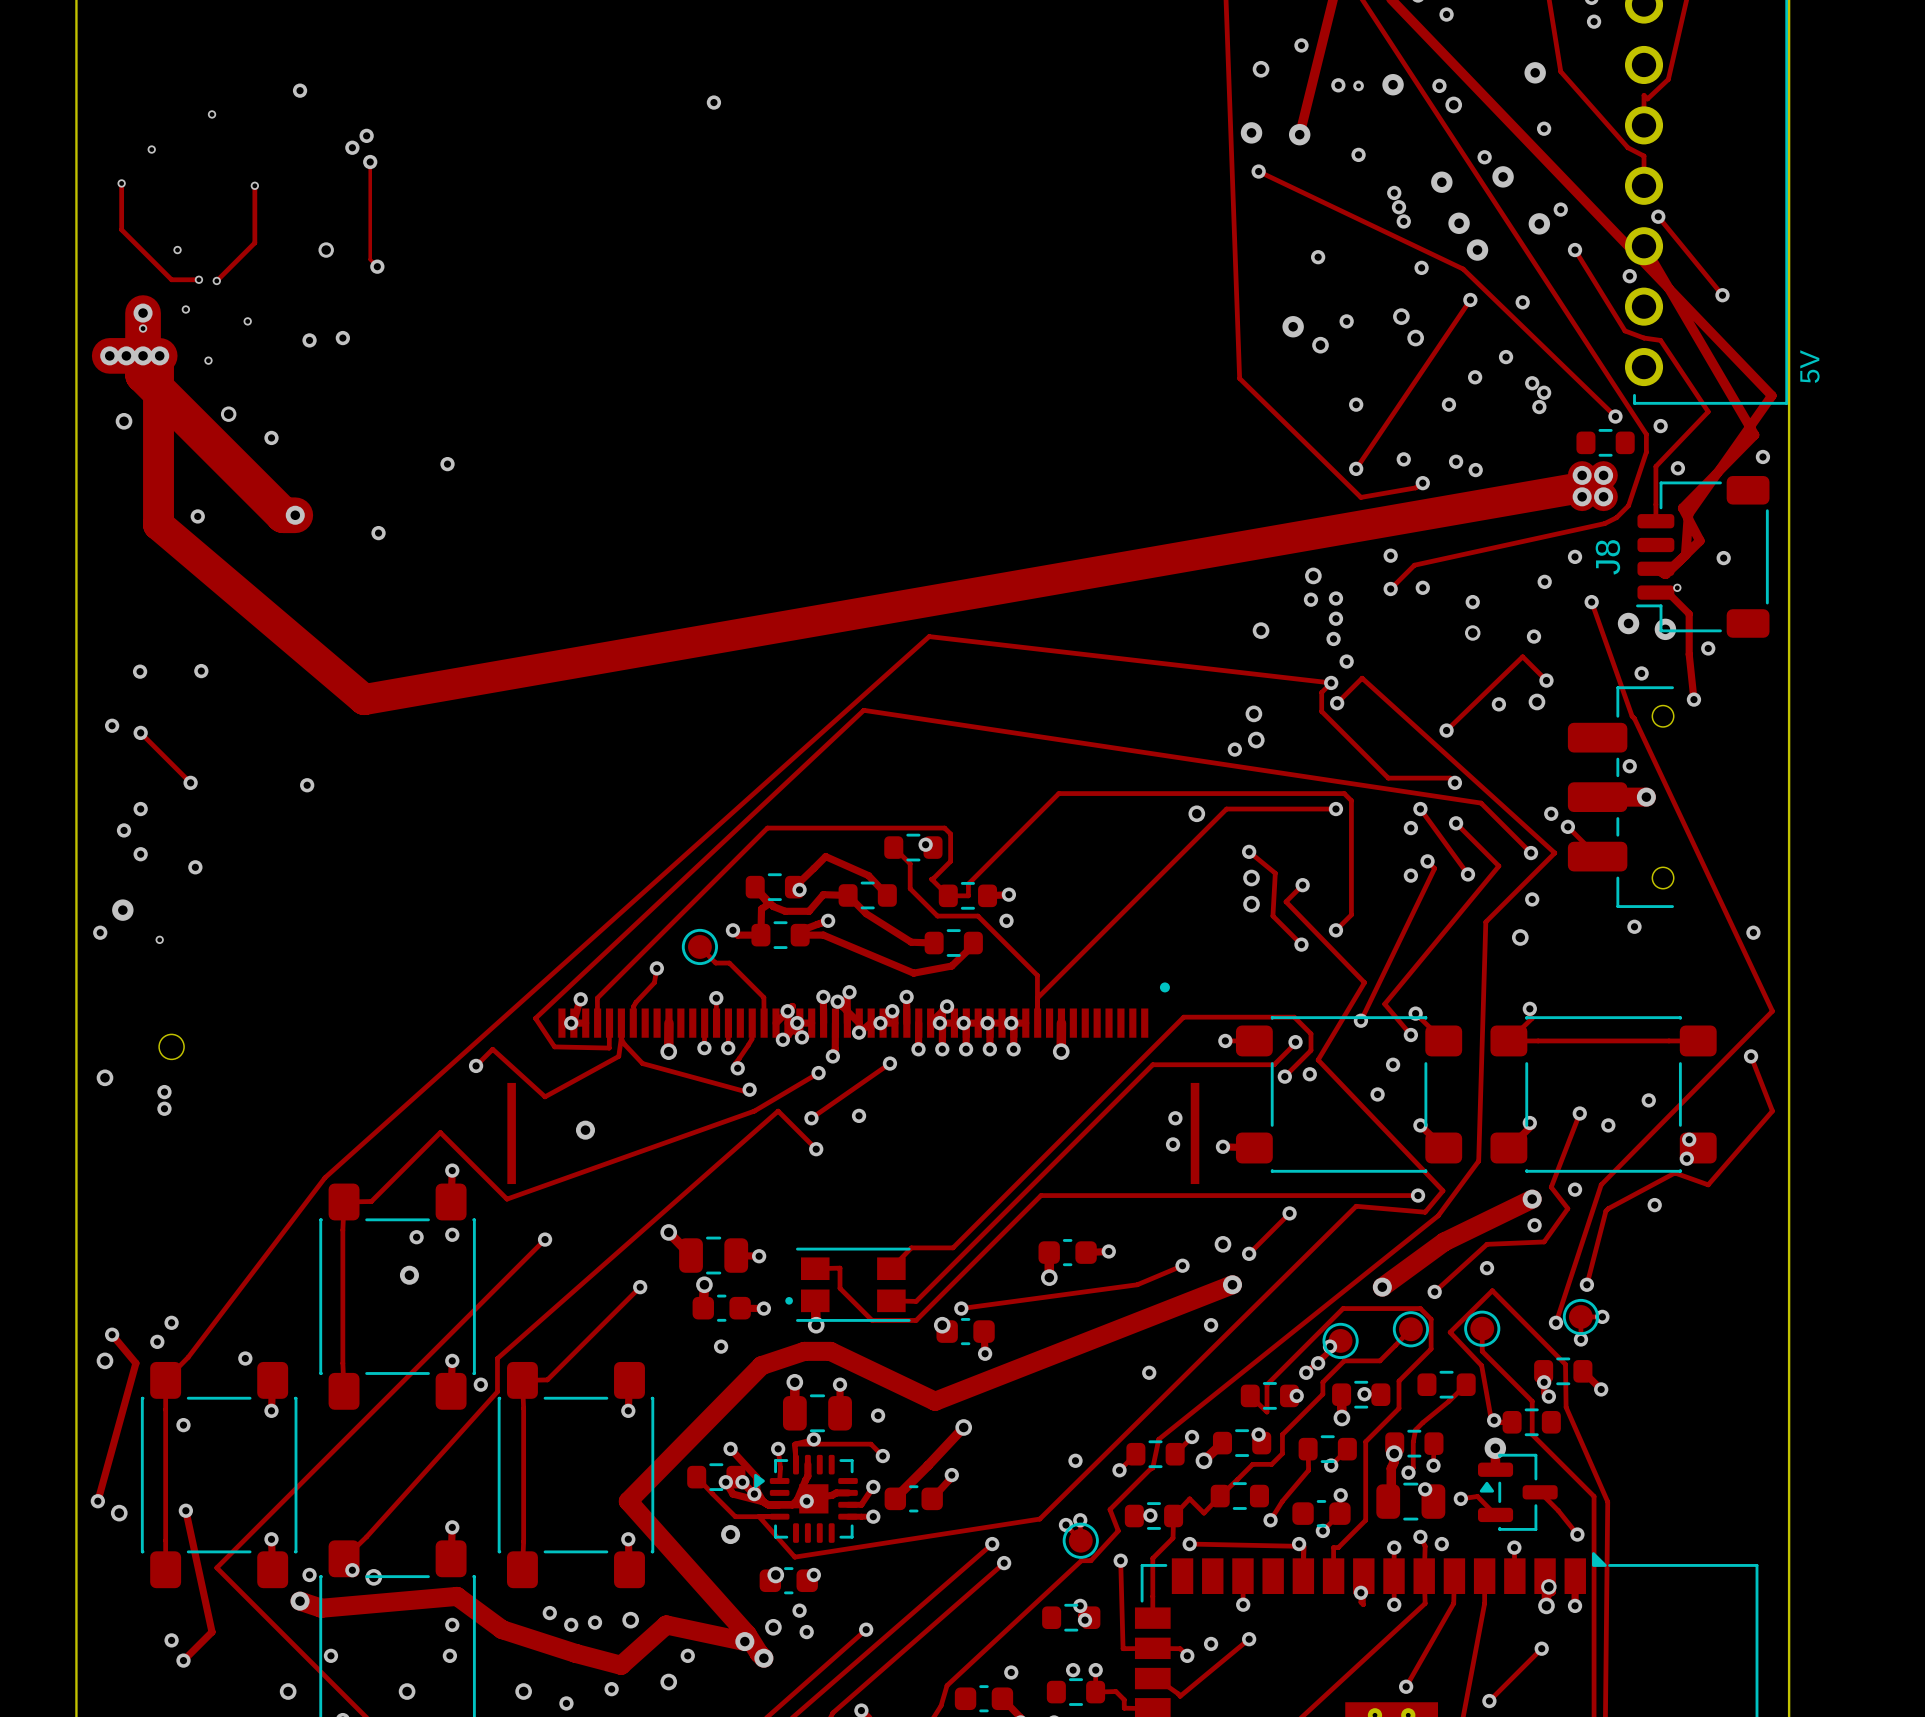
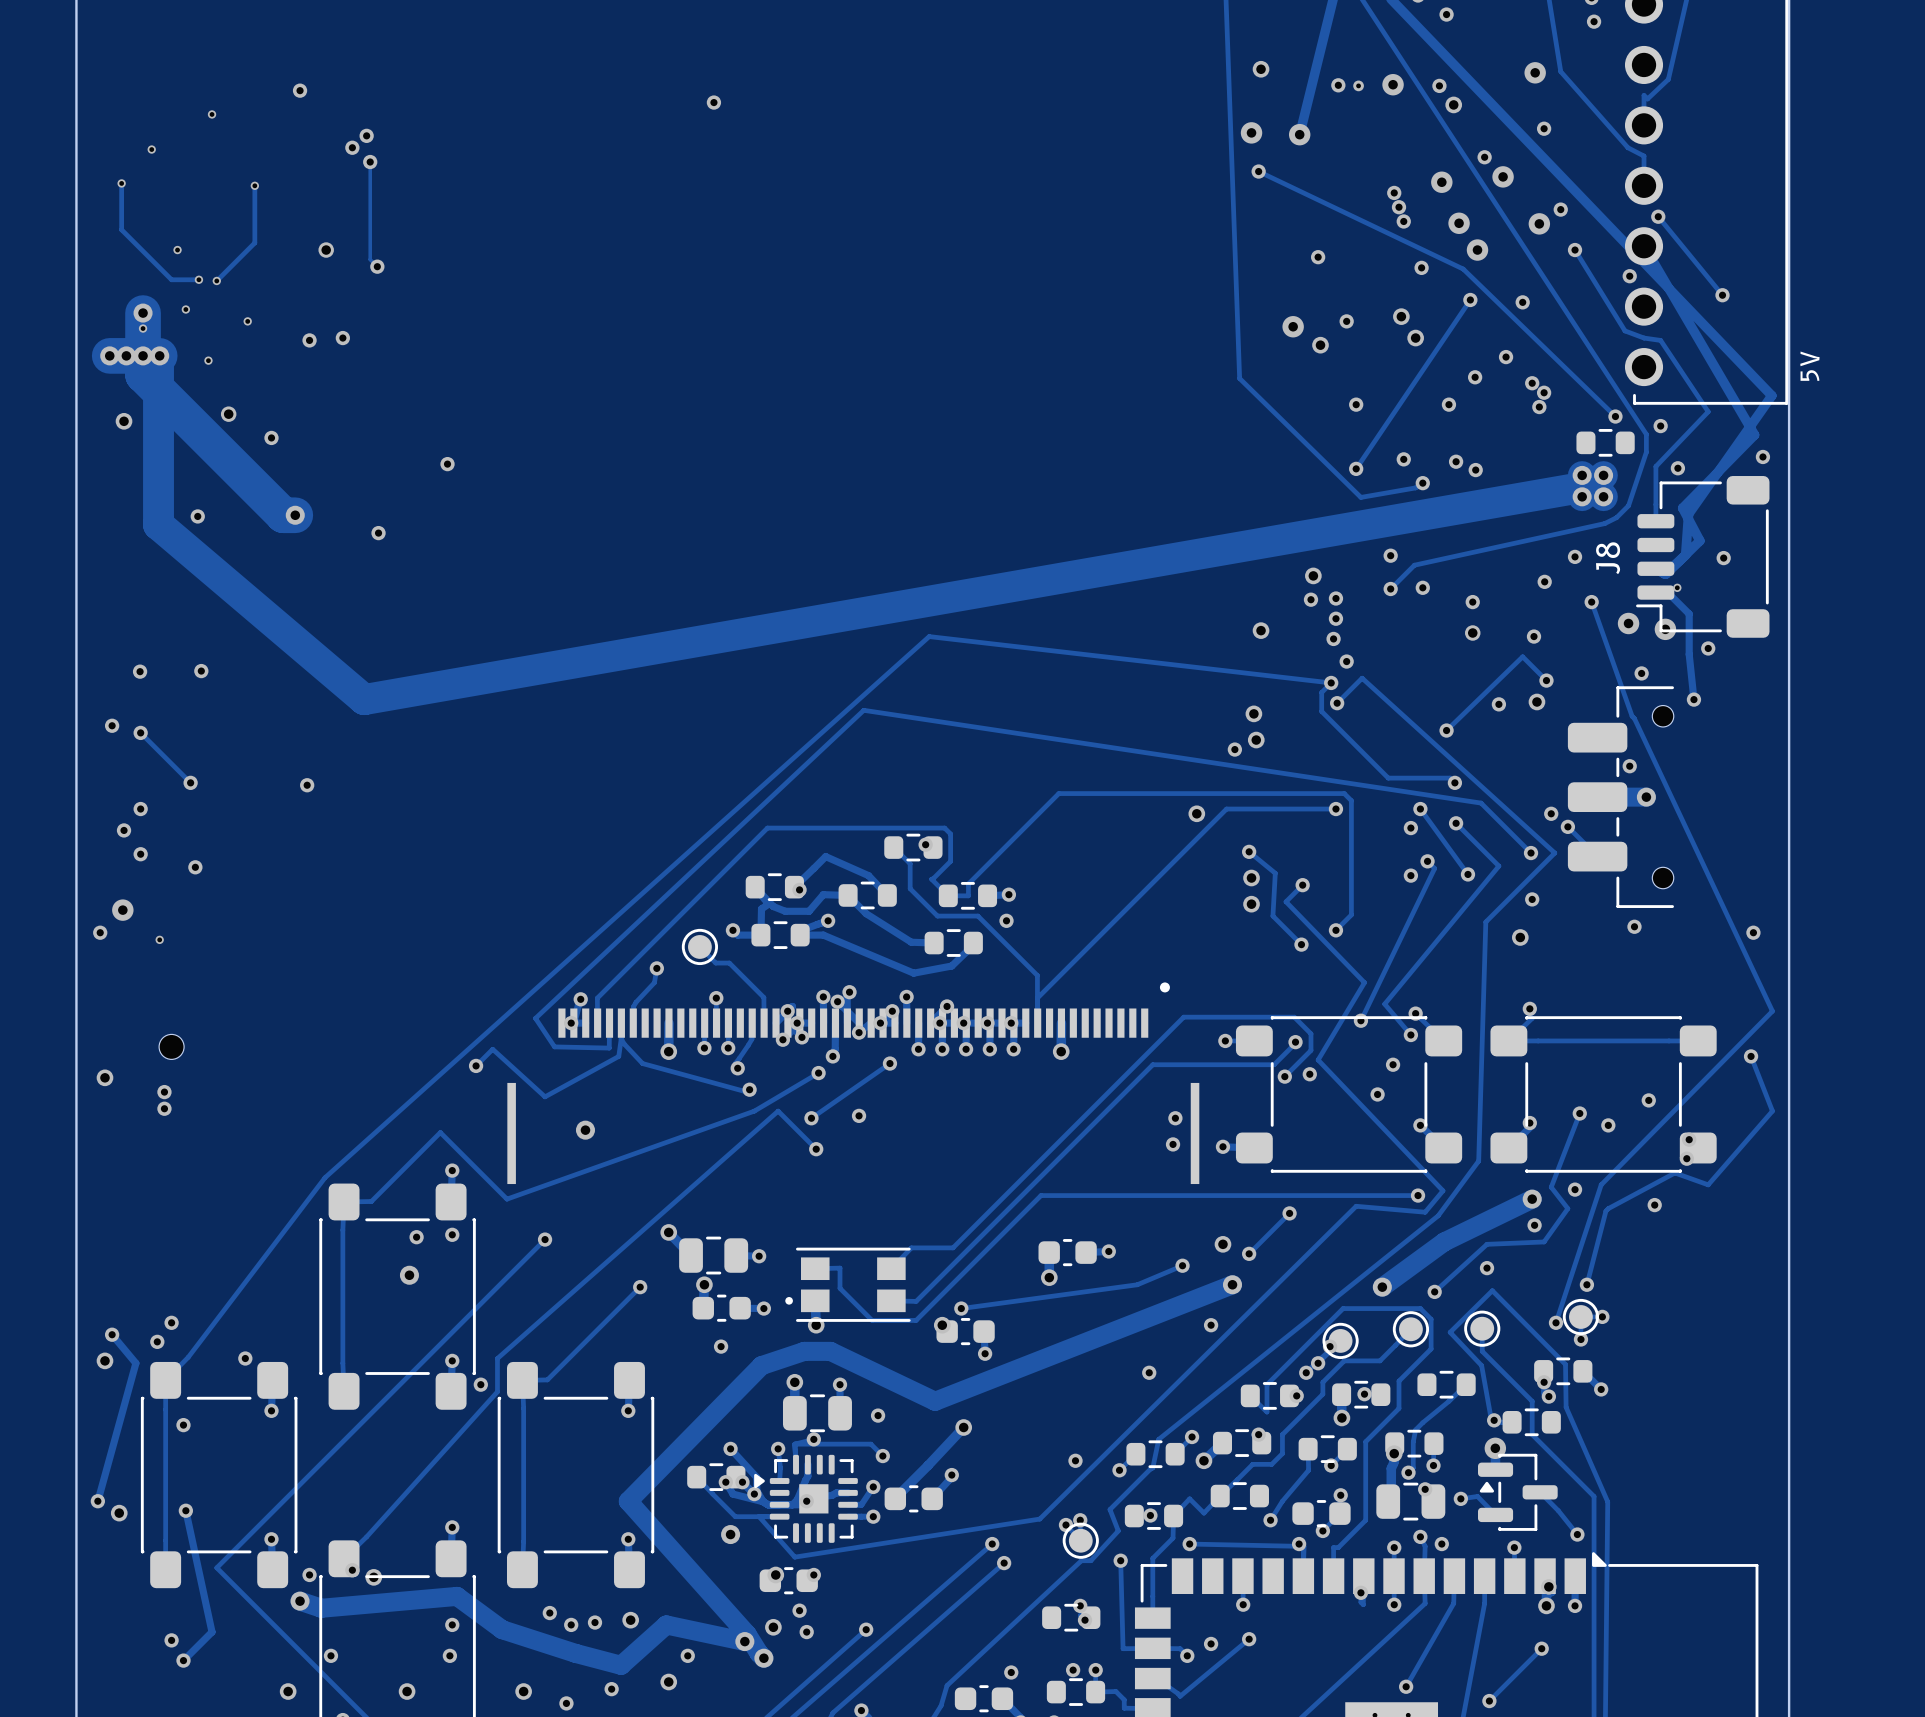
via: (1301, 45) -> none
via: (1358, 154) -> none

